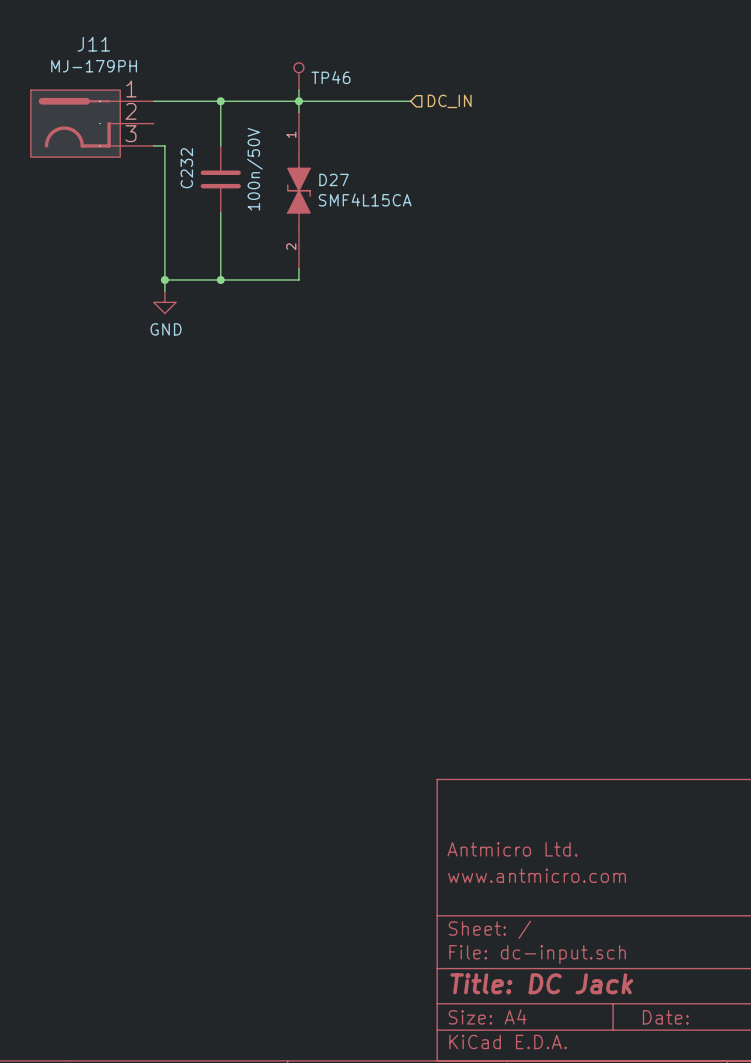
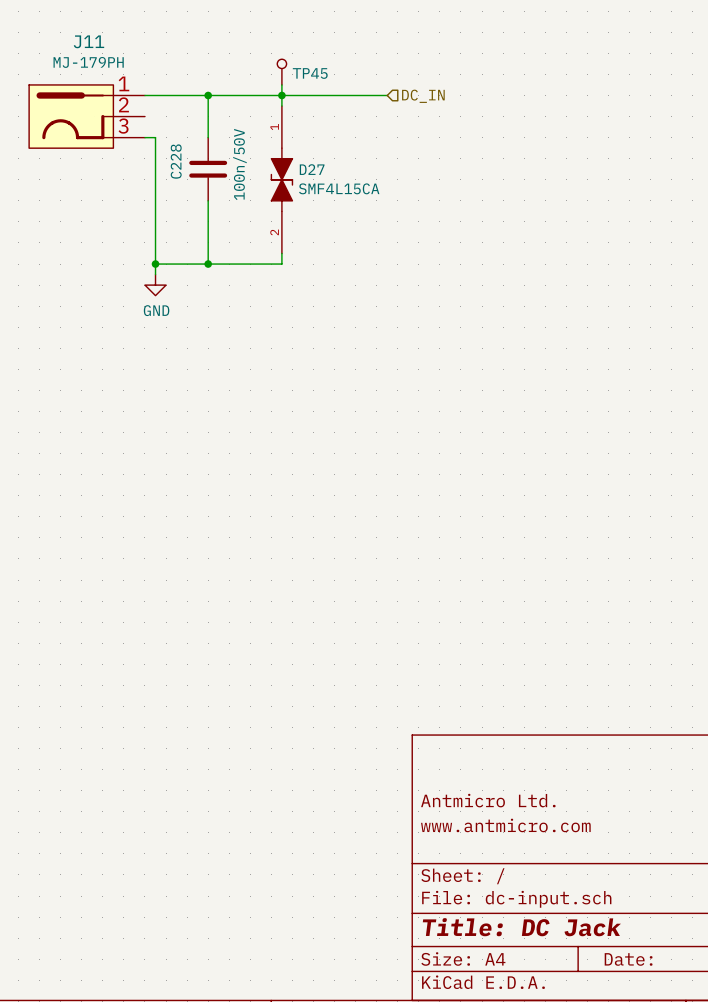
TP46 name: TP46 (330, 77) -> TP45 (310, 73)
C232 name: C232 (186, 168) -> C228 (176, 161)

